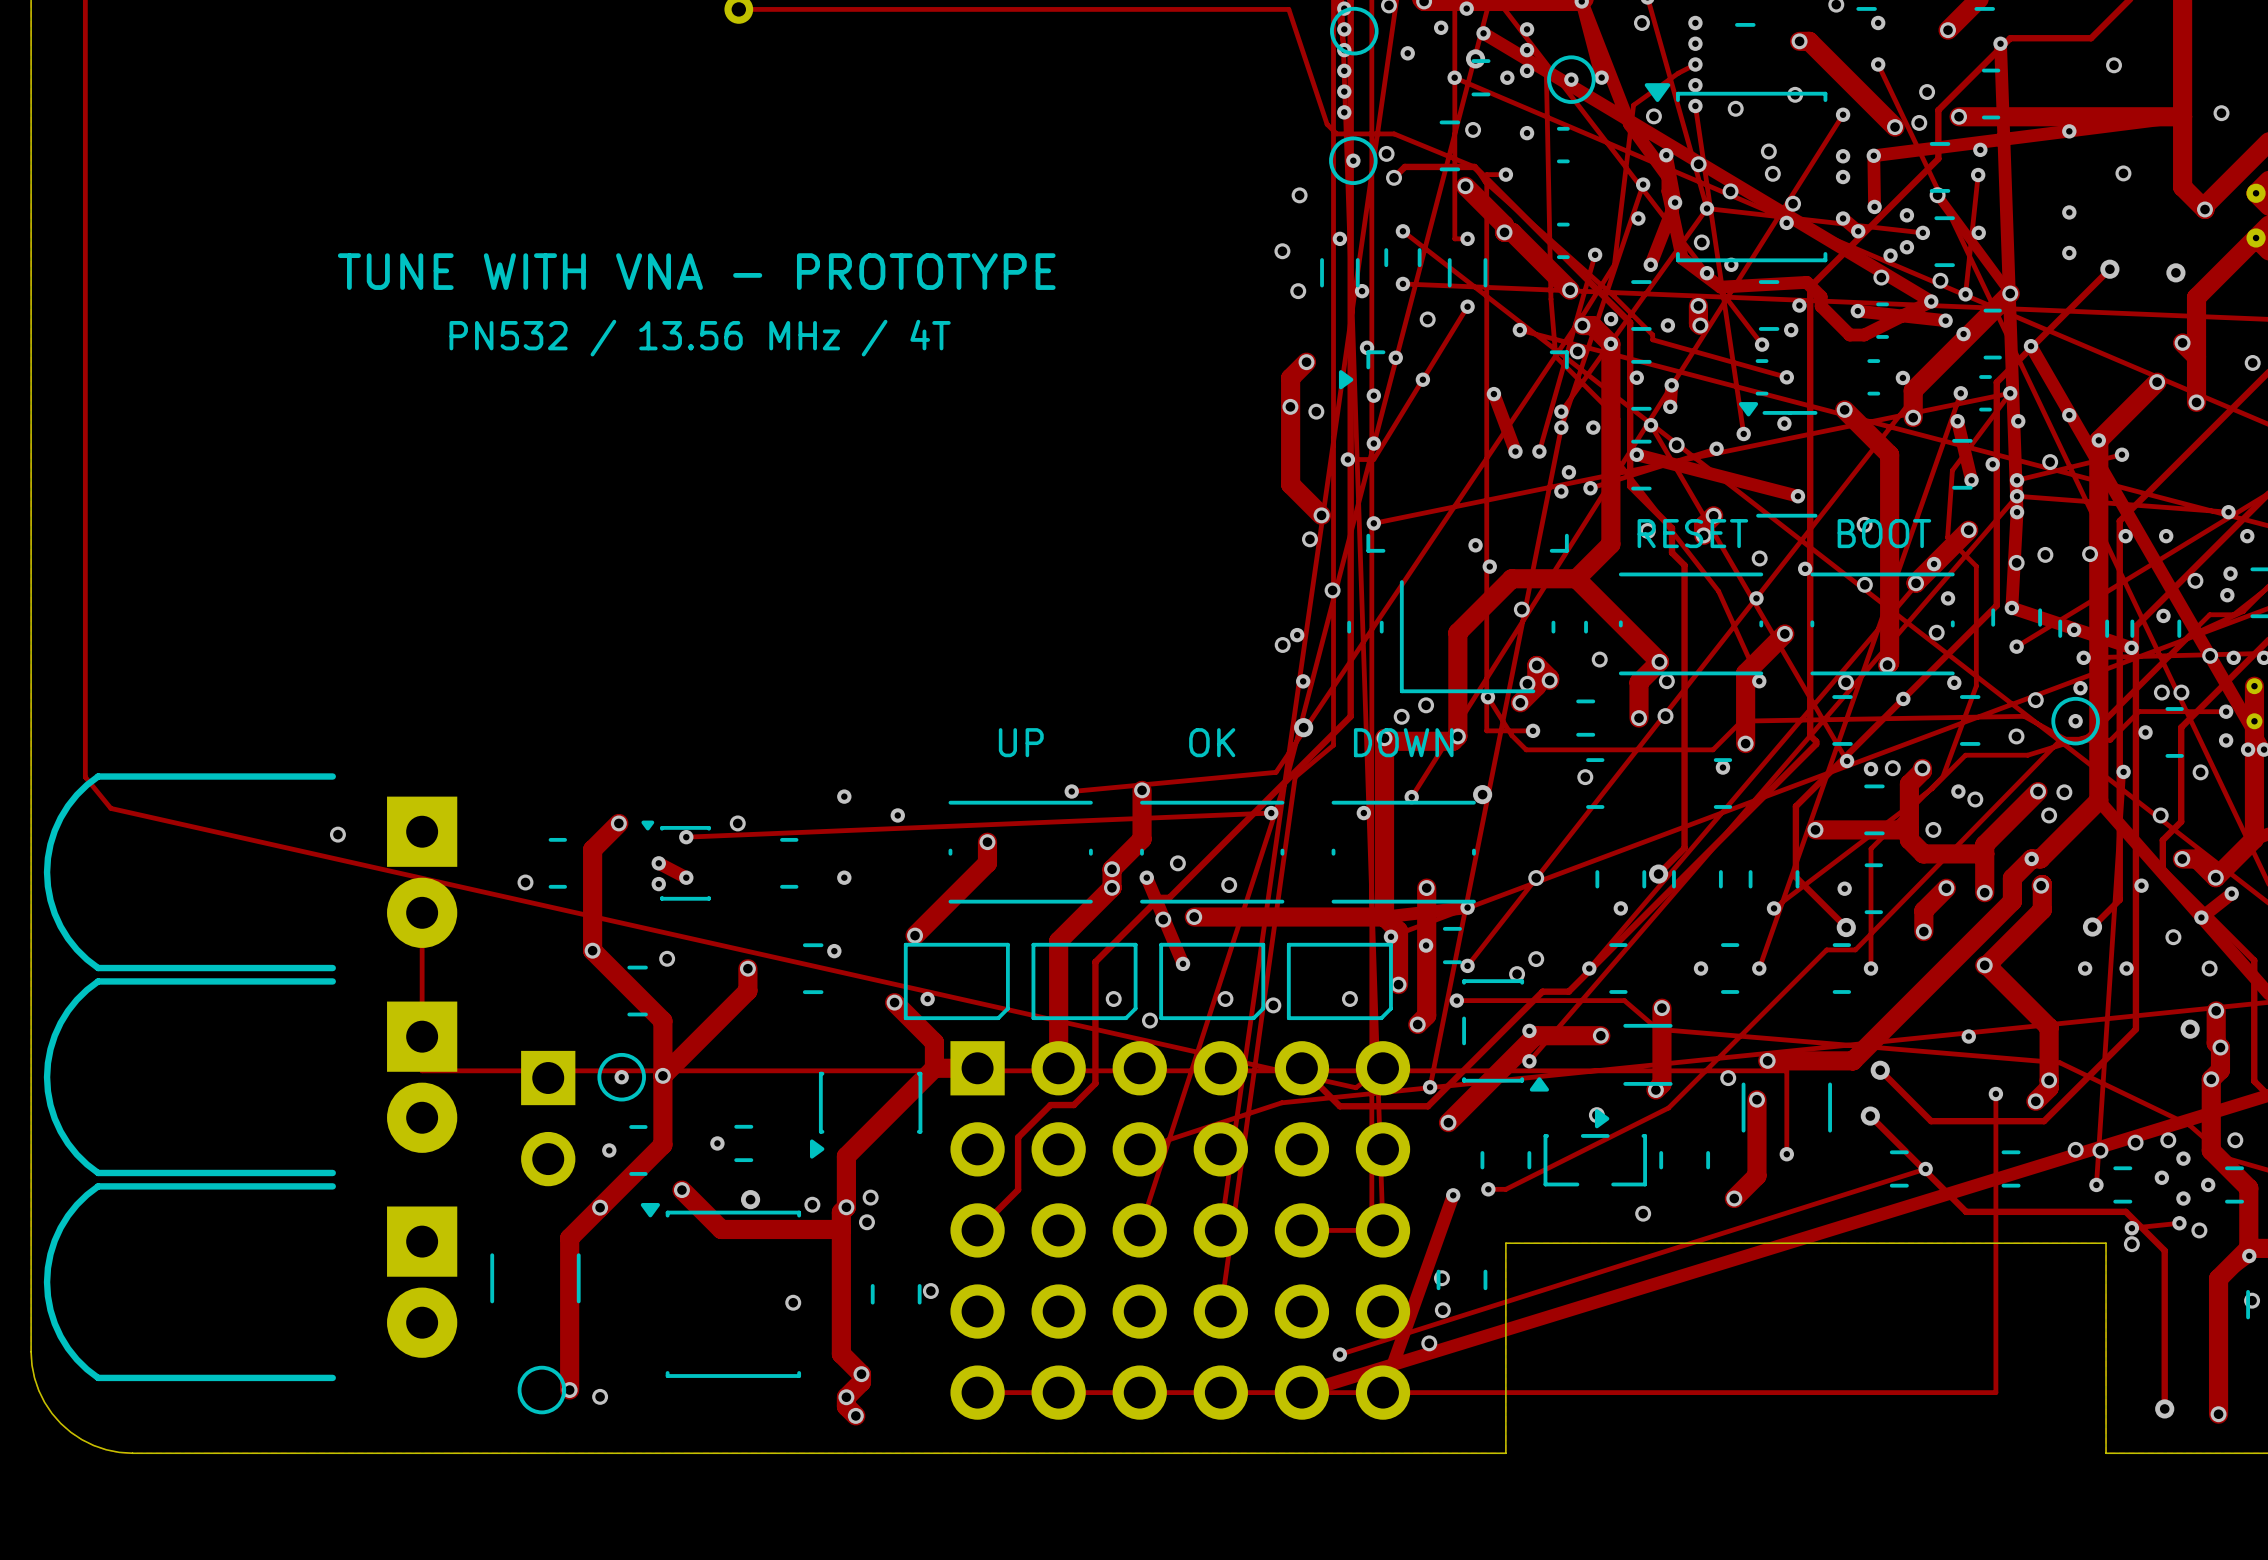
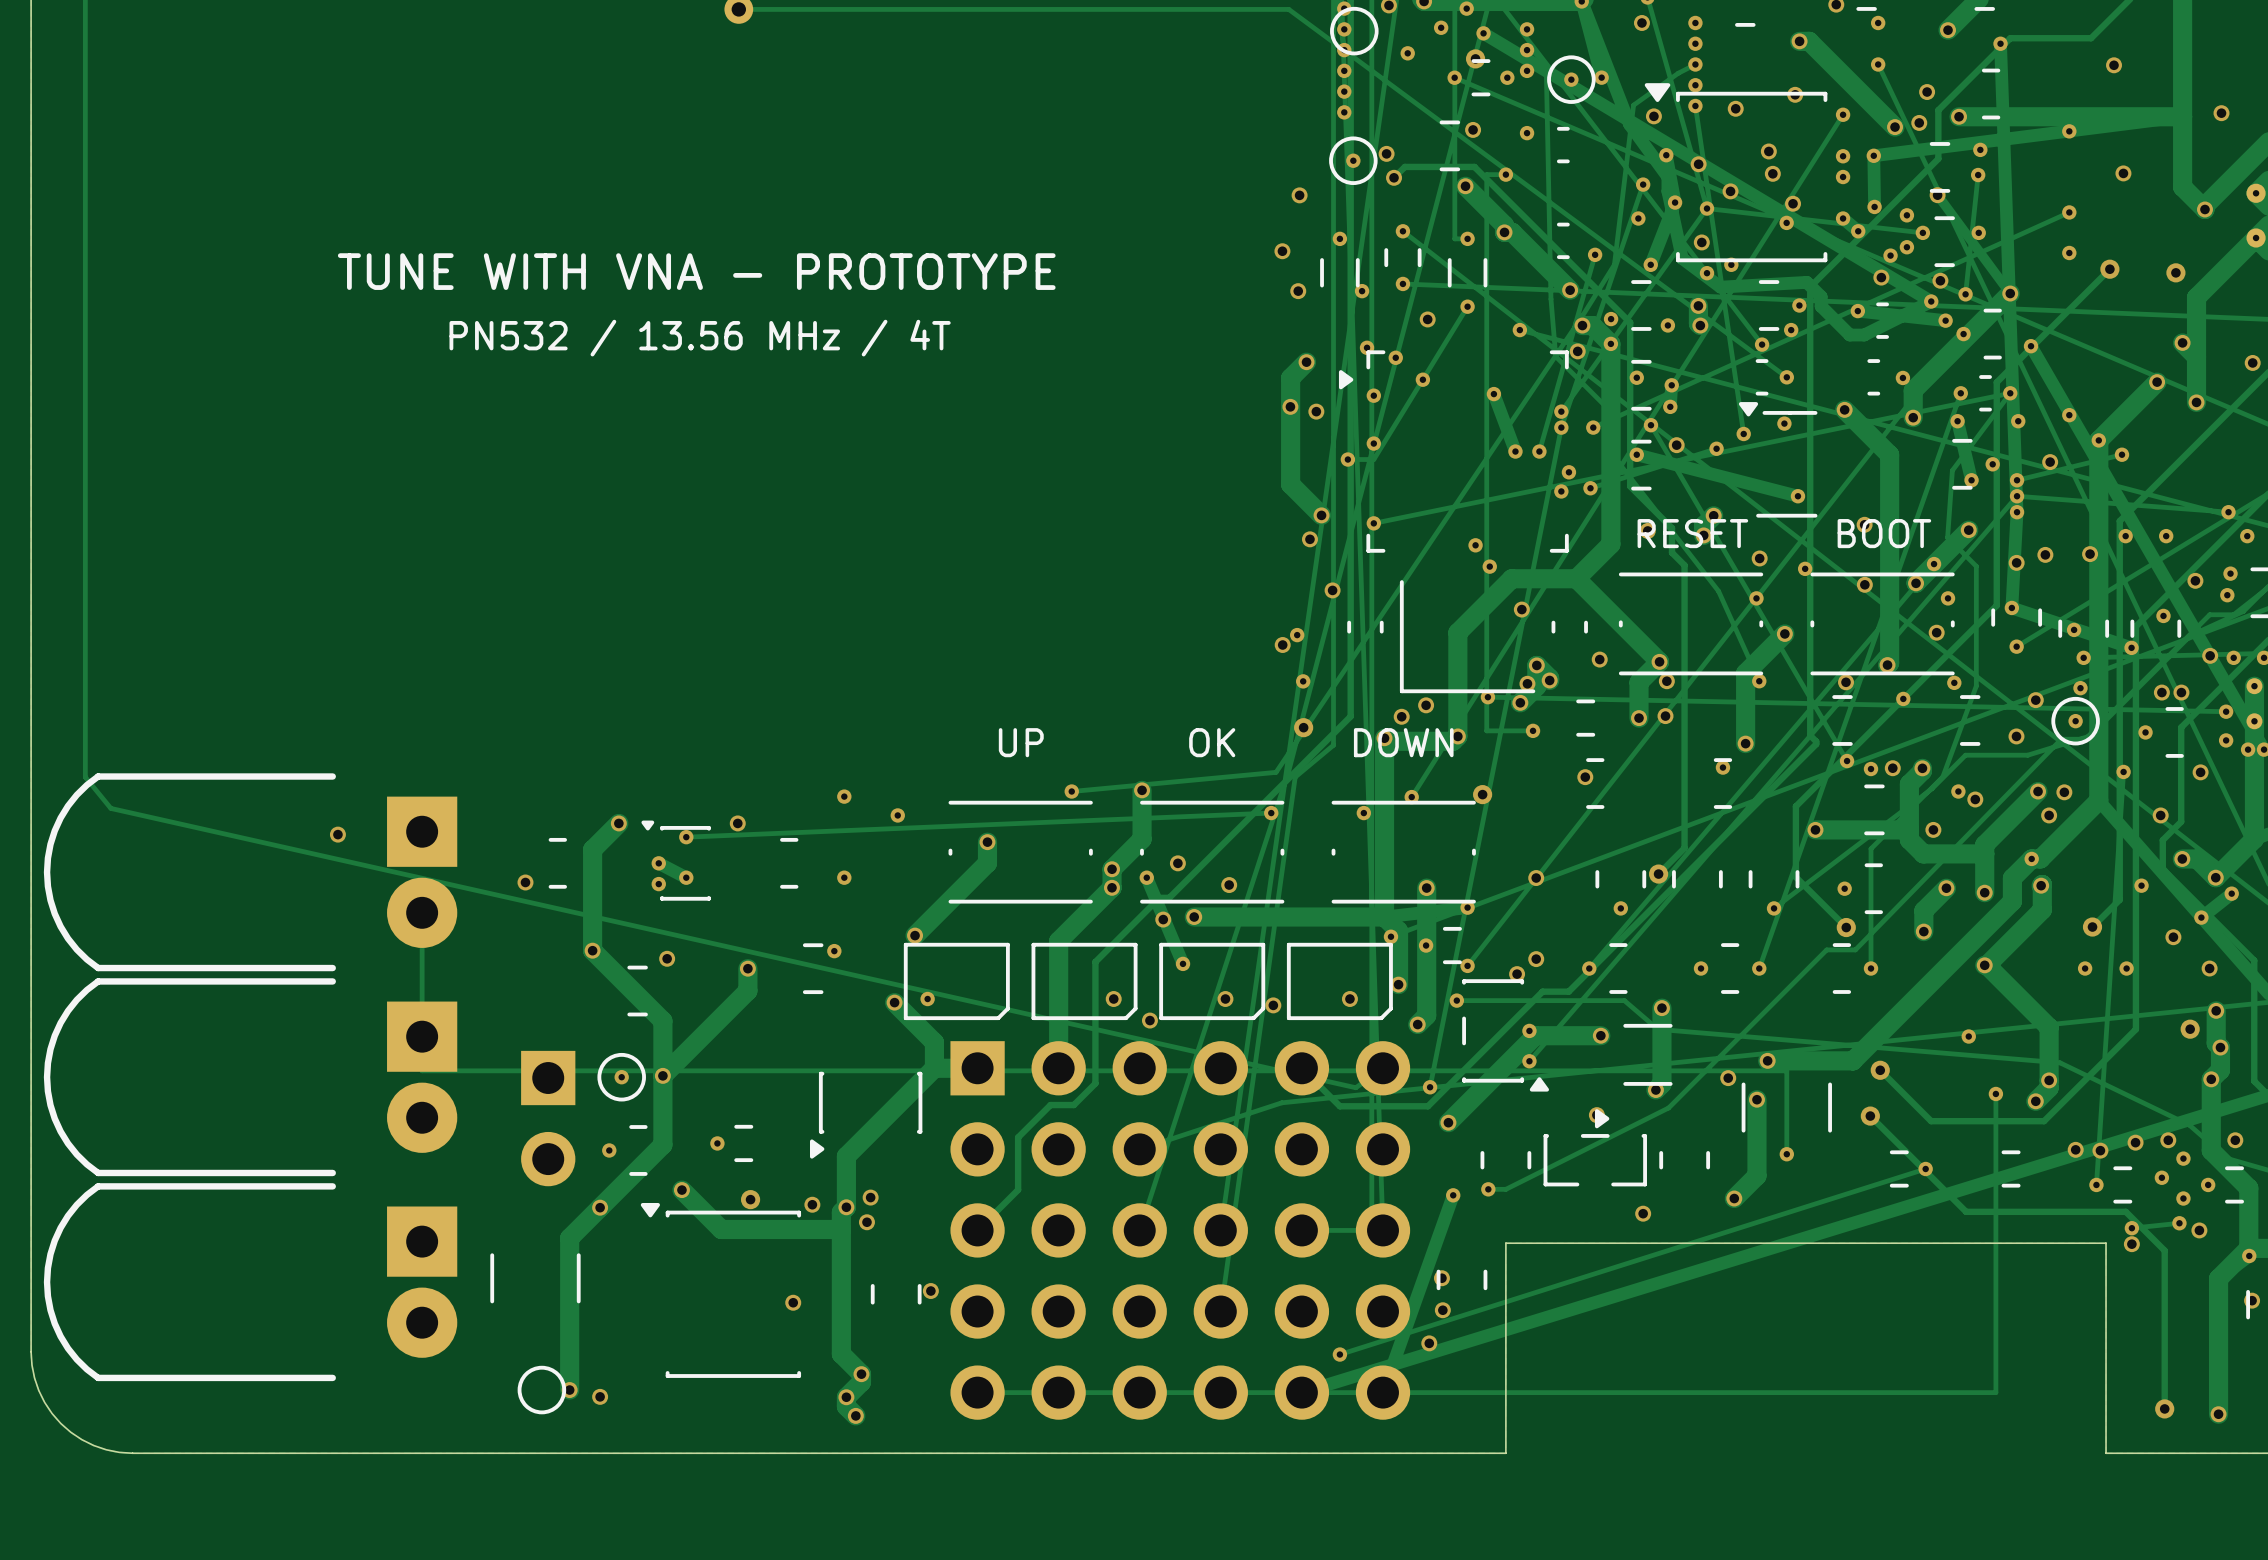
track: (1288, 9) (1327, 124) (1336, 133) (1394, 133) (1475, 167) (1485, 181) (1614, 296) (1652, 335) (1652, 339) (1786, 377) -> (1288, 9) (1786, 377)
track: none -> (2069, 212) (1593, 427)
track: (1487, 697) (1511, 735) (1526, 749) (1712, 749) (1741, 721) (2024, 716) (2067, 740) (2110, 740) (2139, 711) (2226, 711) -> (1487, 697) (2226, 711)

